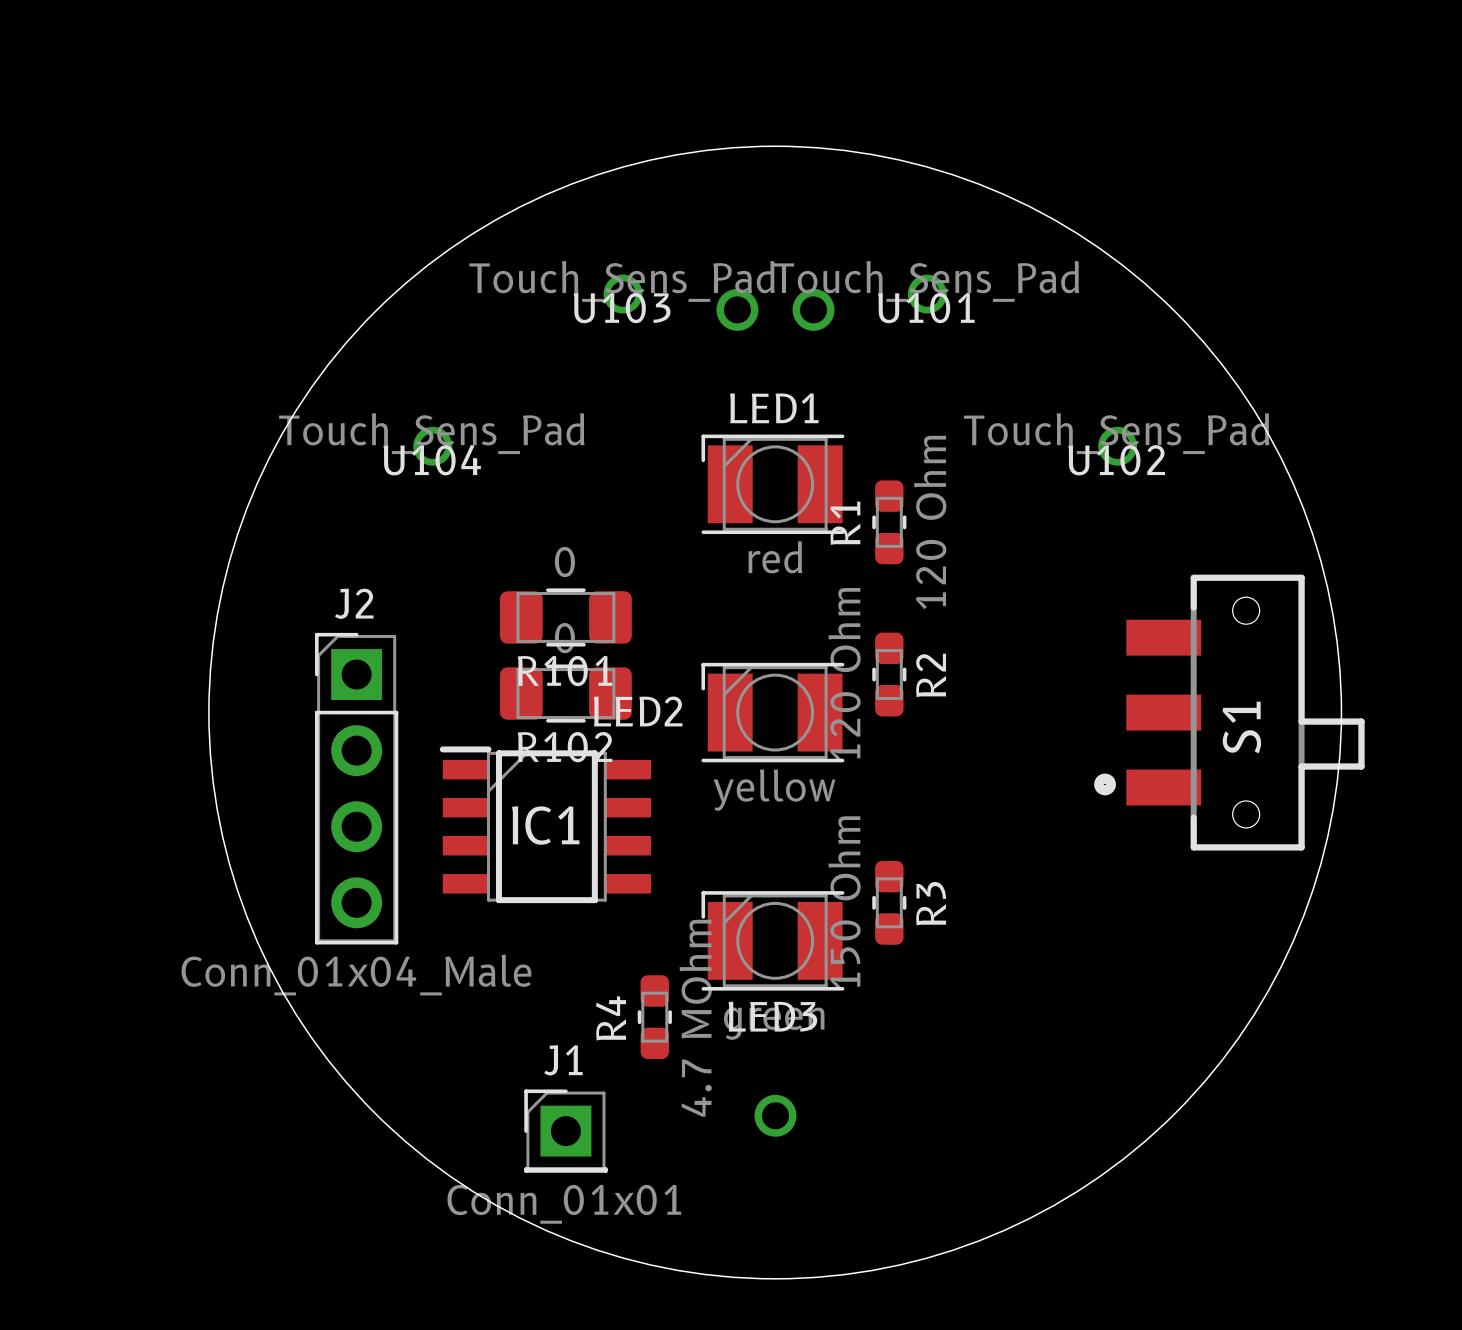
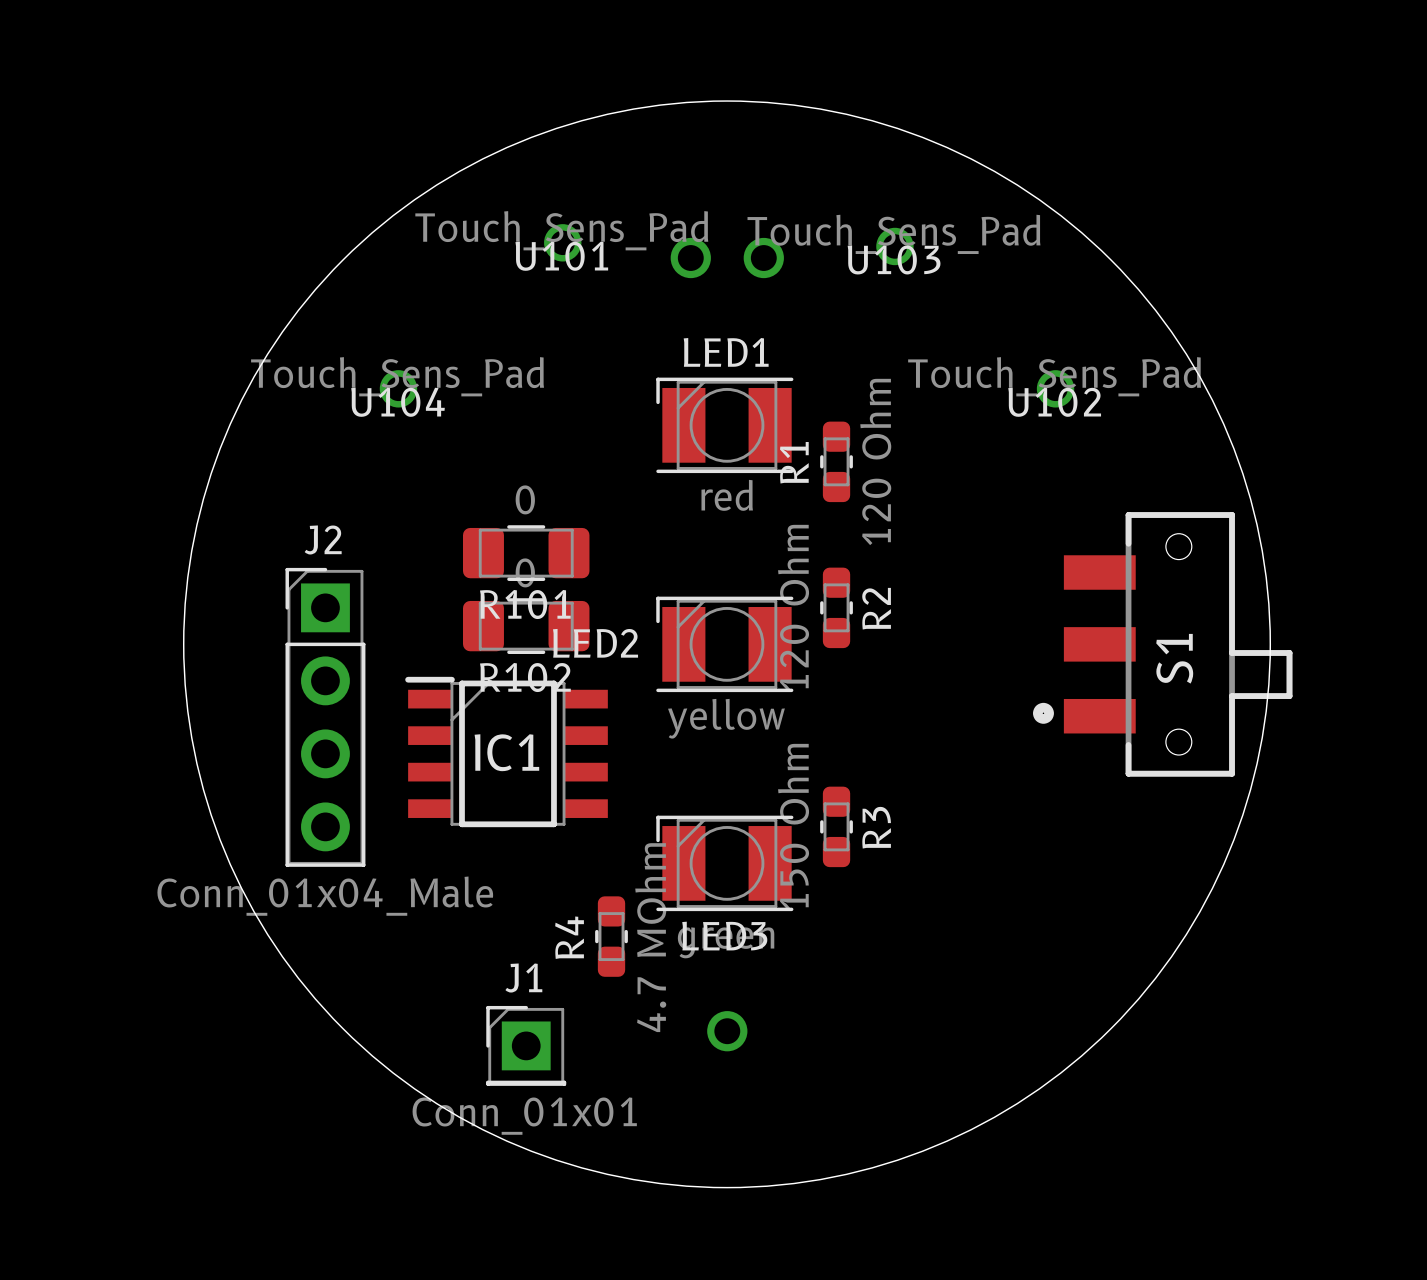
U103 position: (622, 294) -> (894, 246)
U101 position: (927, 294) -> (562, 242)

